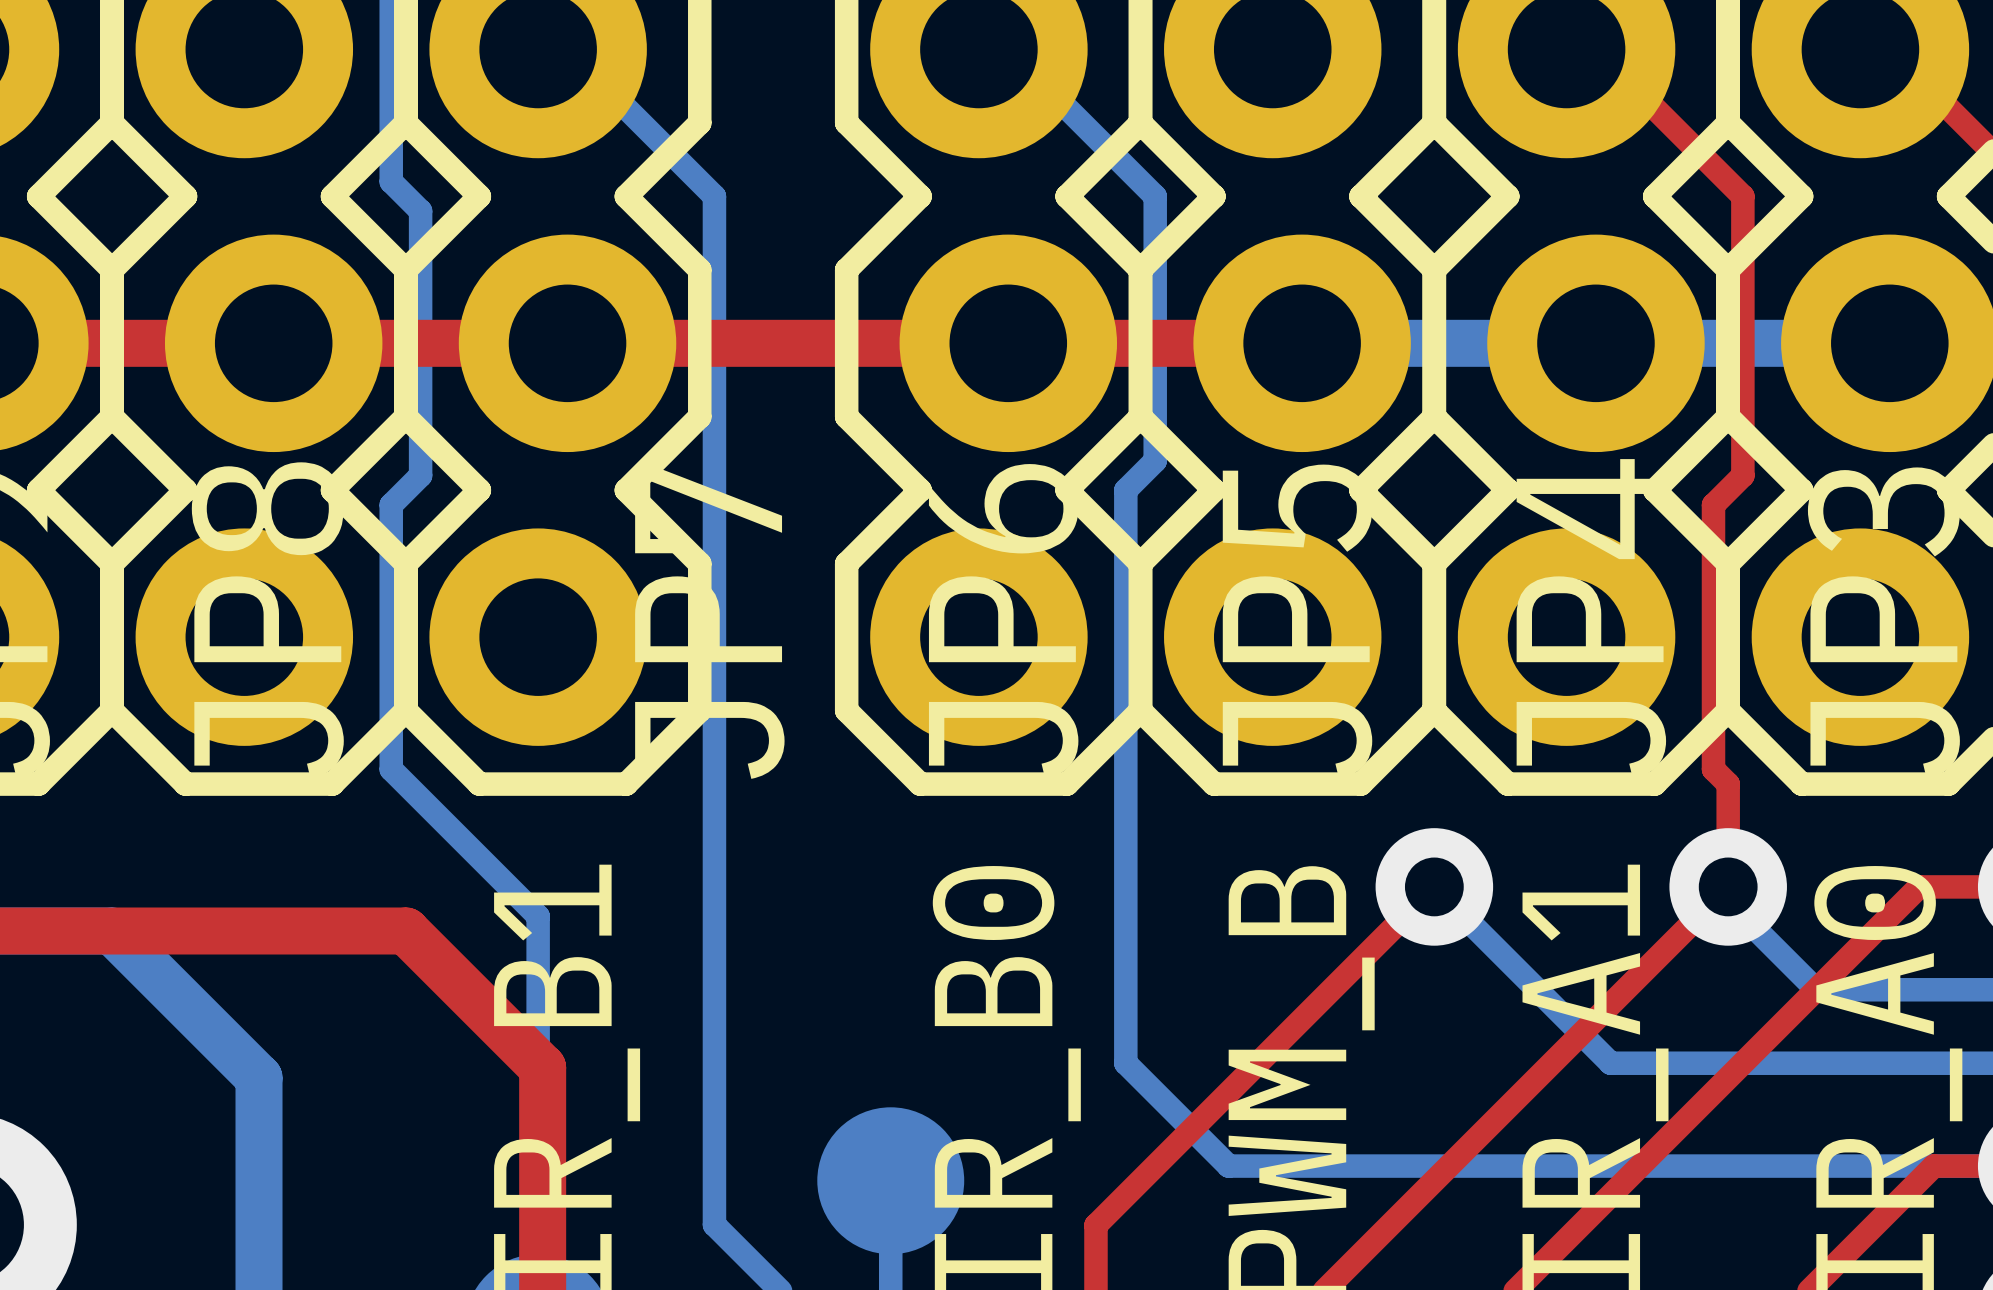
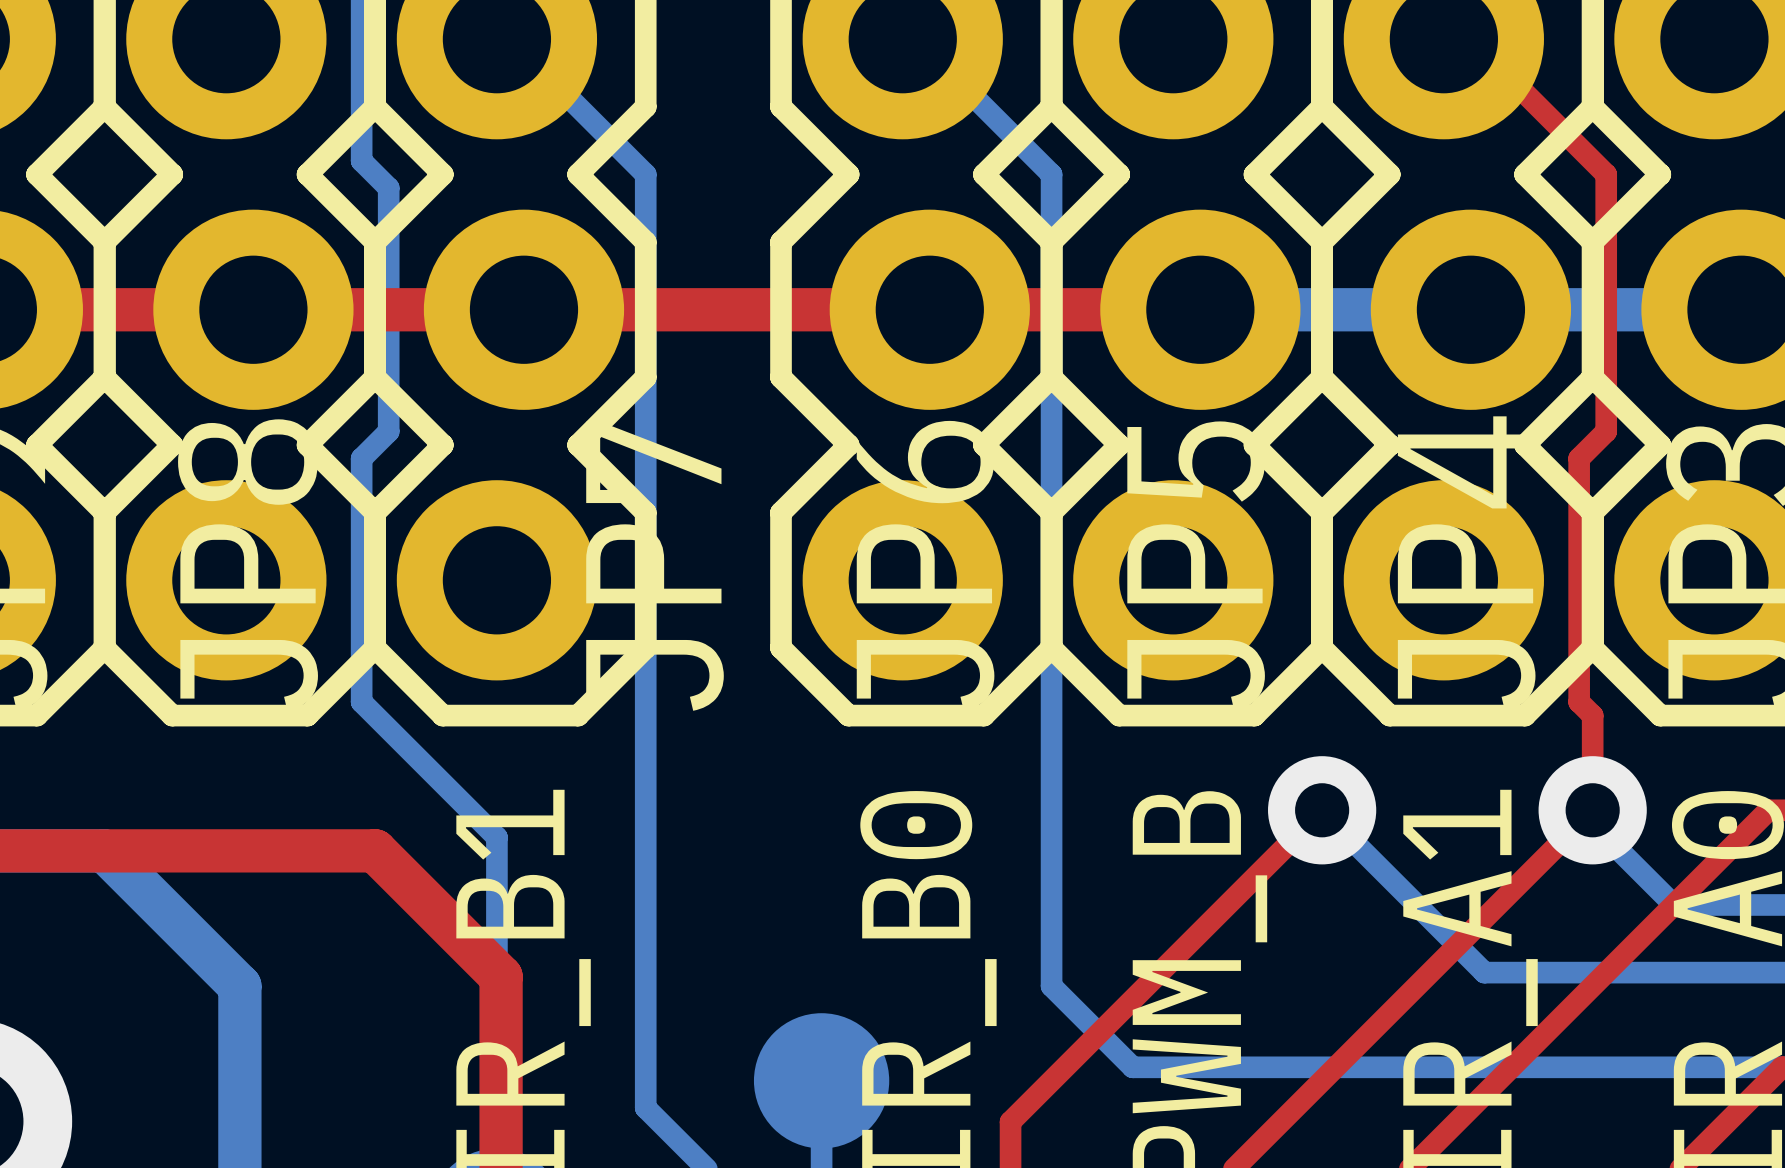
bottom track: (552, 49) (567, 49) (714, 196) (714, 1224) -> (510, 39) (645, 174) (645, 1107) (659, 1121)
bottom track: (993, 49) (1008, 49) (1155, 196) (1155, 460) (1125, 490) (1125, 1063) (1140, 1077) -> (916, 39) (1051, 174) (1051, 986)

